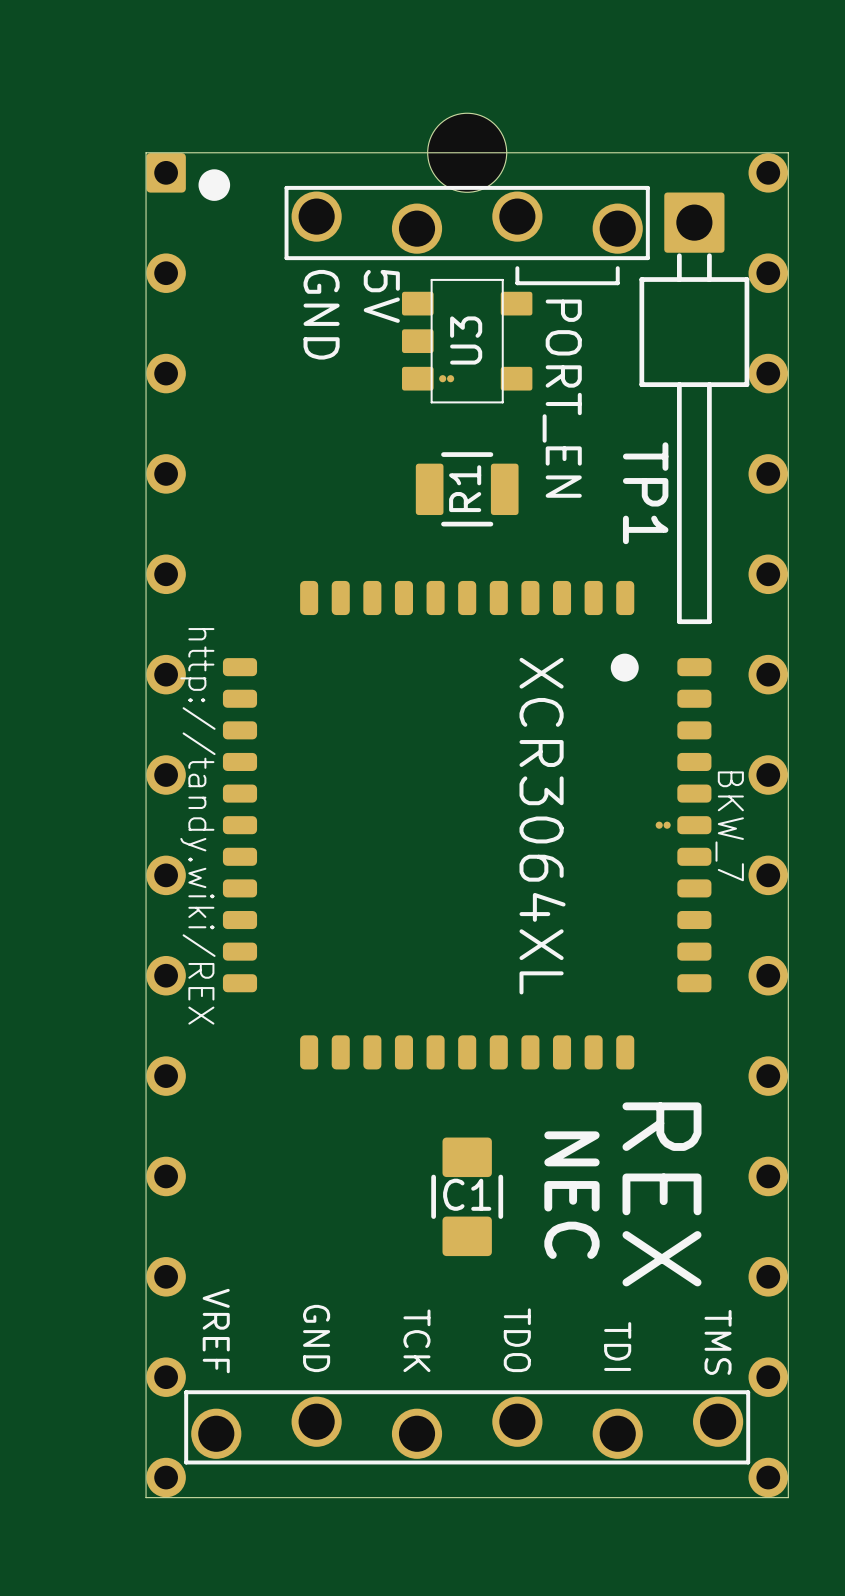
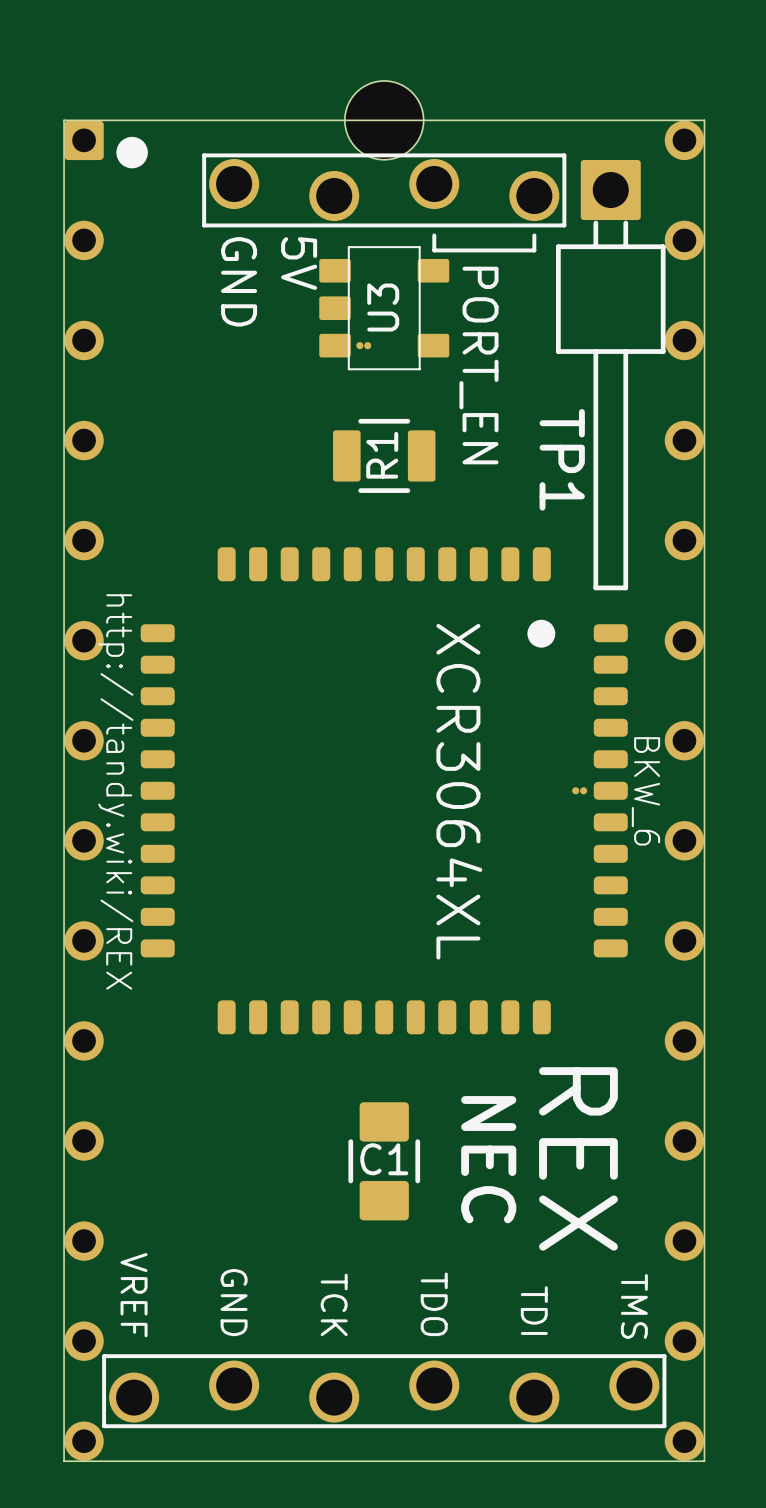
text: BKW_7 (729, 826) -> BKW_6 (645, 791)

